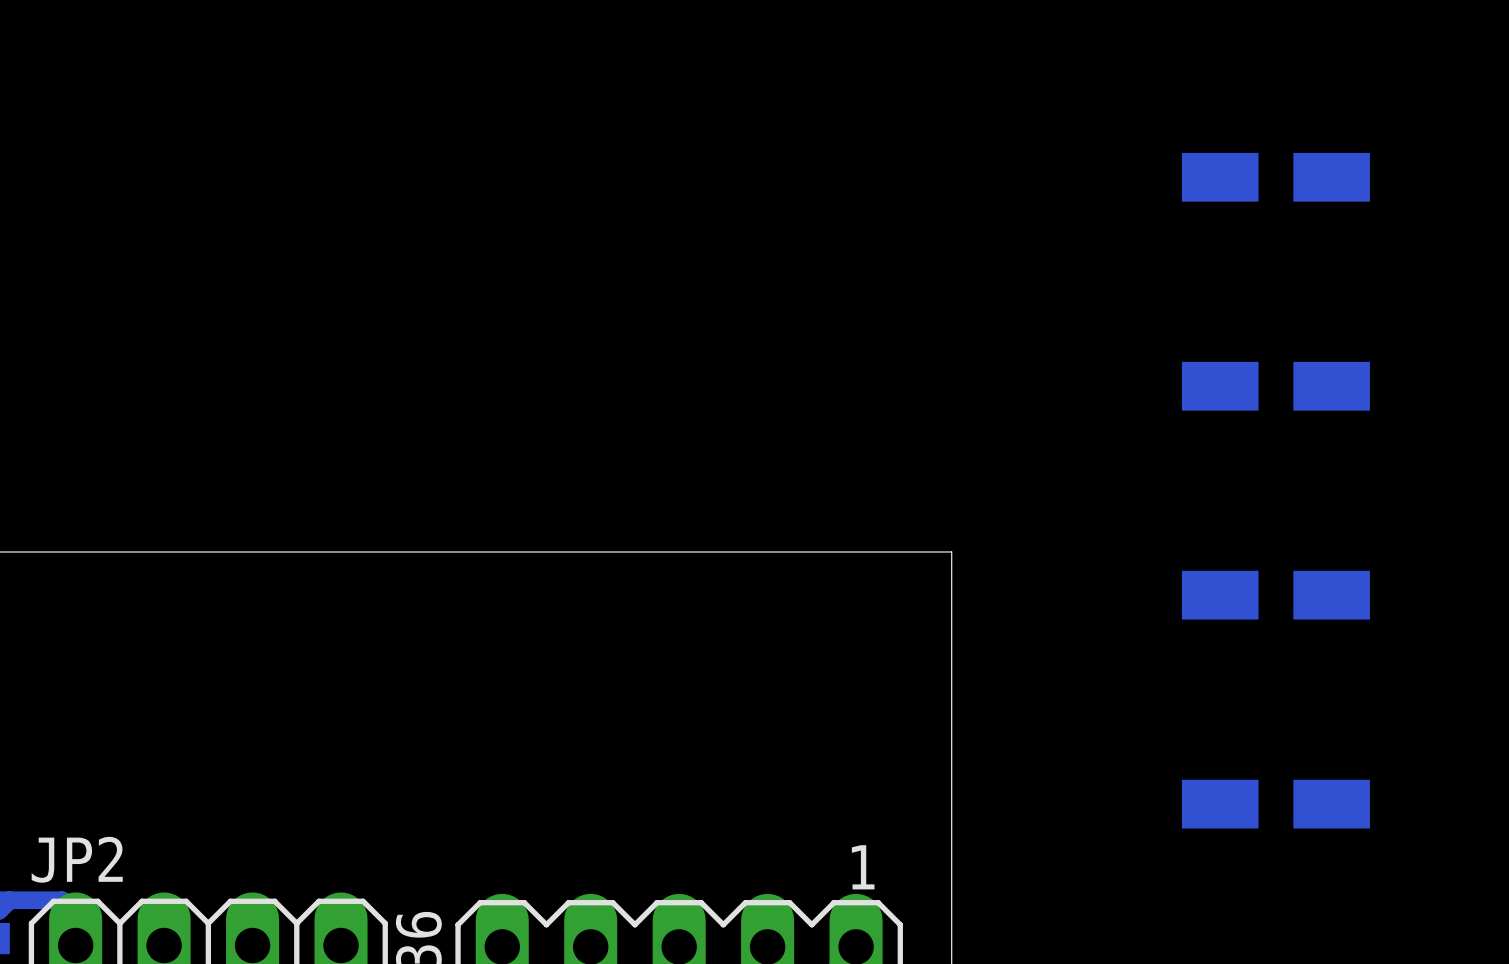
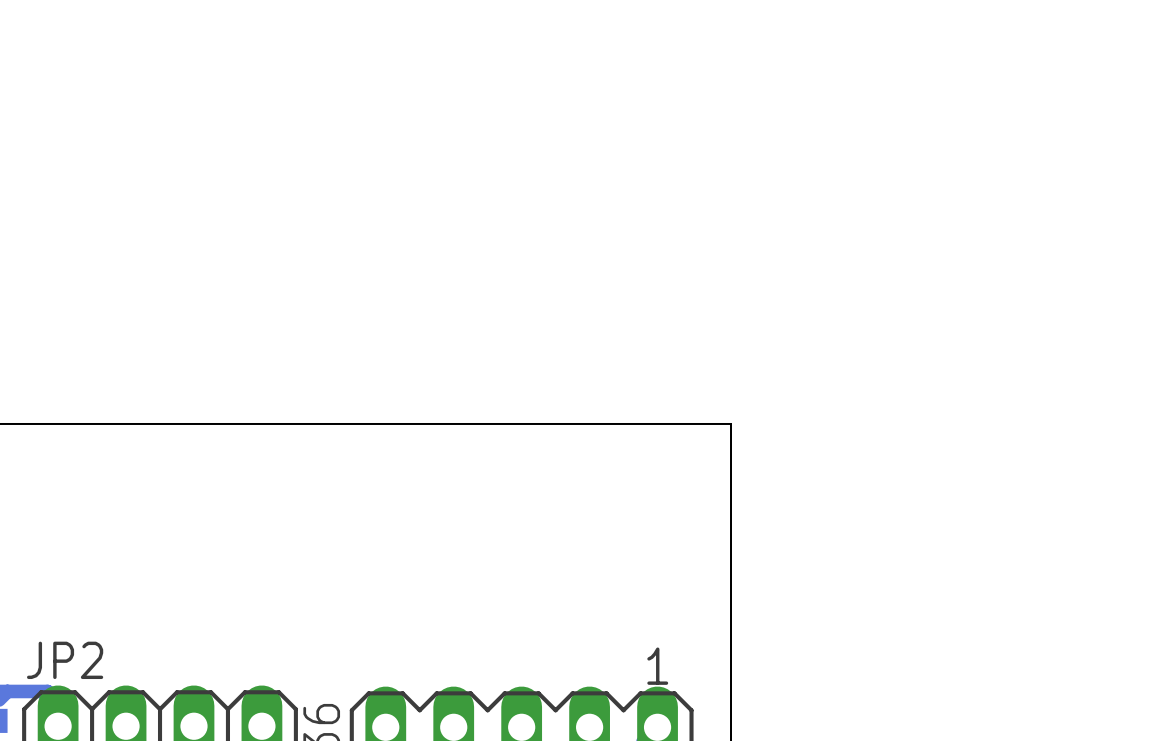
part: (1275, 177) -> none
part: (1275, 386) -> none
part: (1275, 595) -> none
part: (1275, 804) -> none

